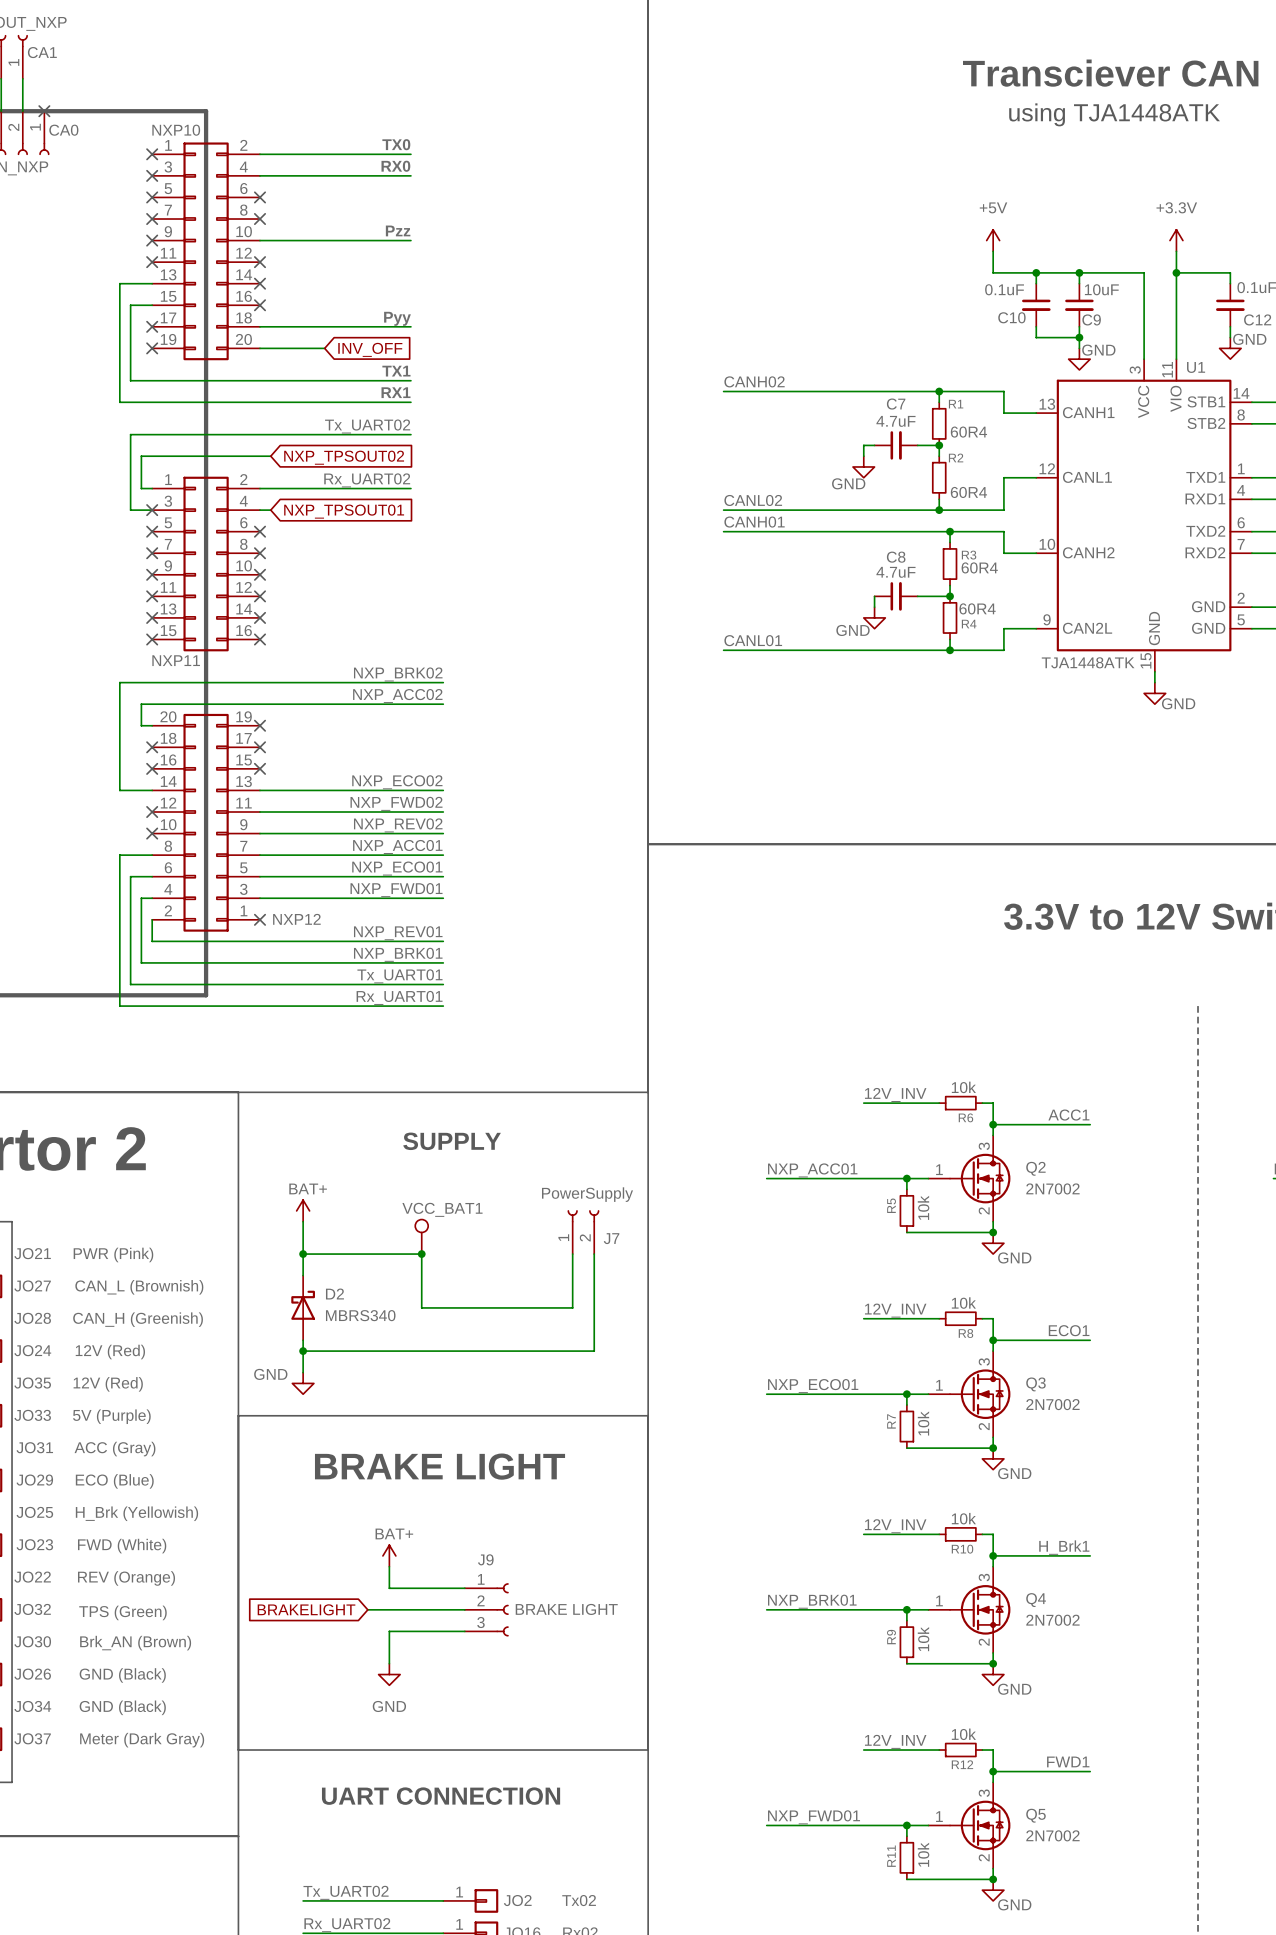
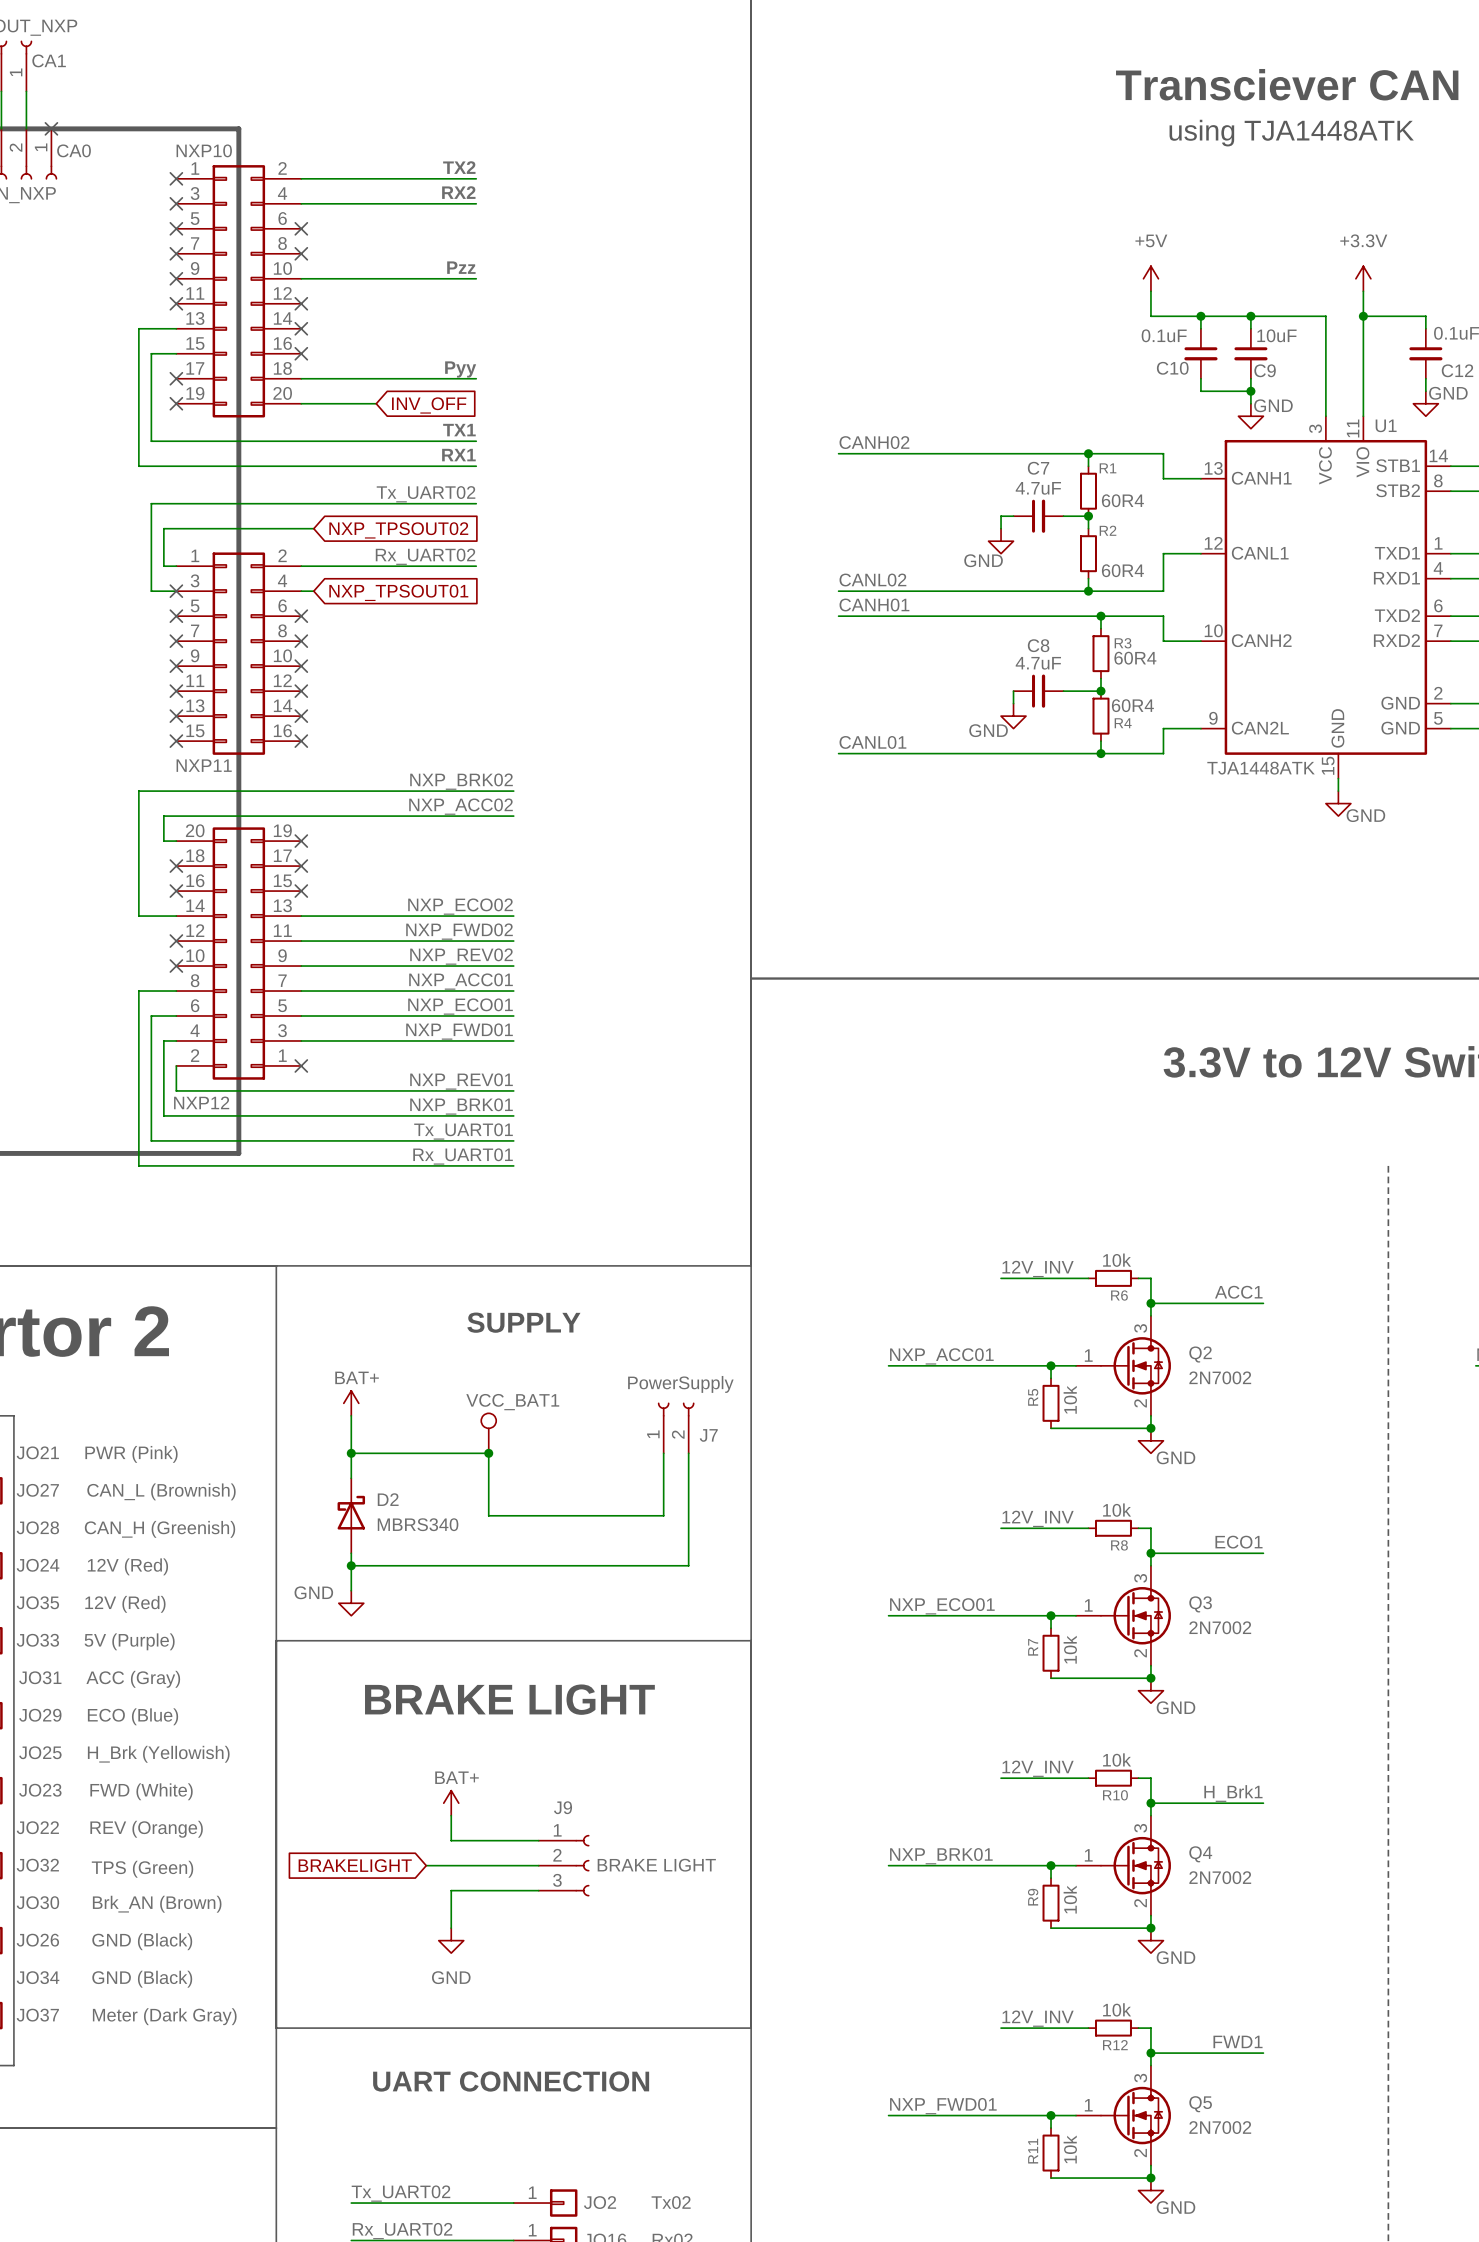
label: TX0 (396, 144) -> TX2 (459, 167)
label: RX0 (395, 166) -> RX2 (458, 192)
part value position: NXP12 (296, 919) -> NXP12 (201, 1102)

